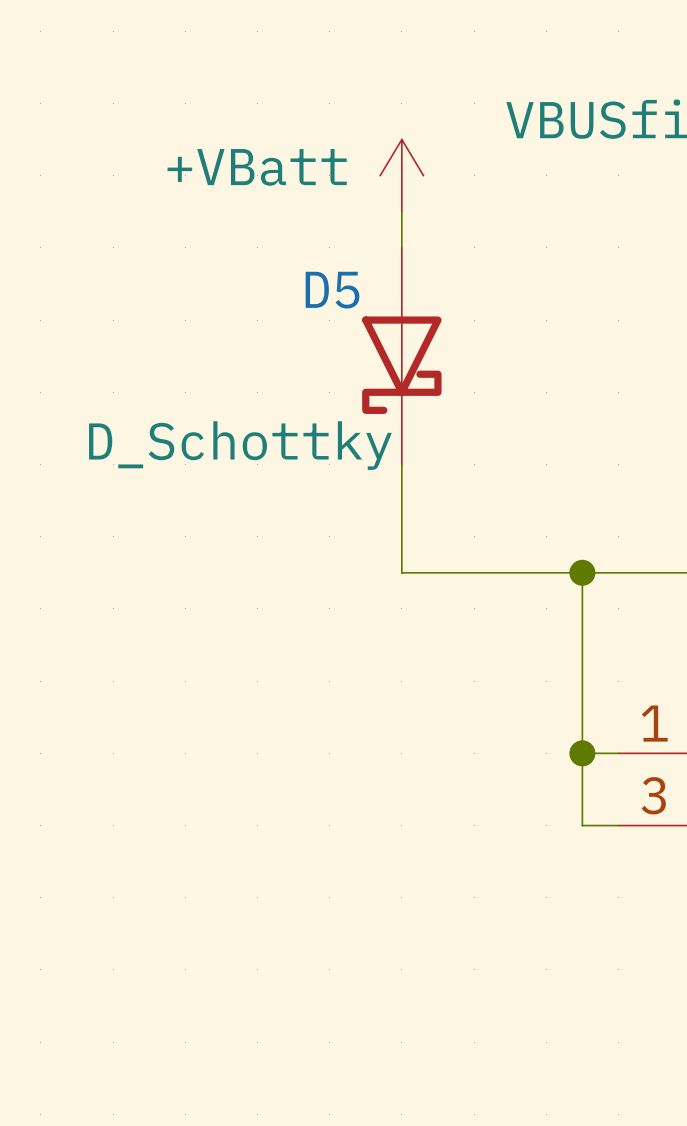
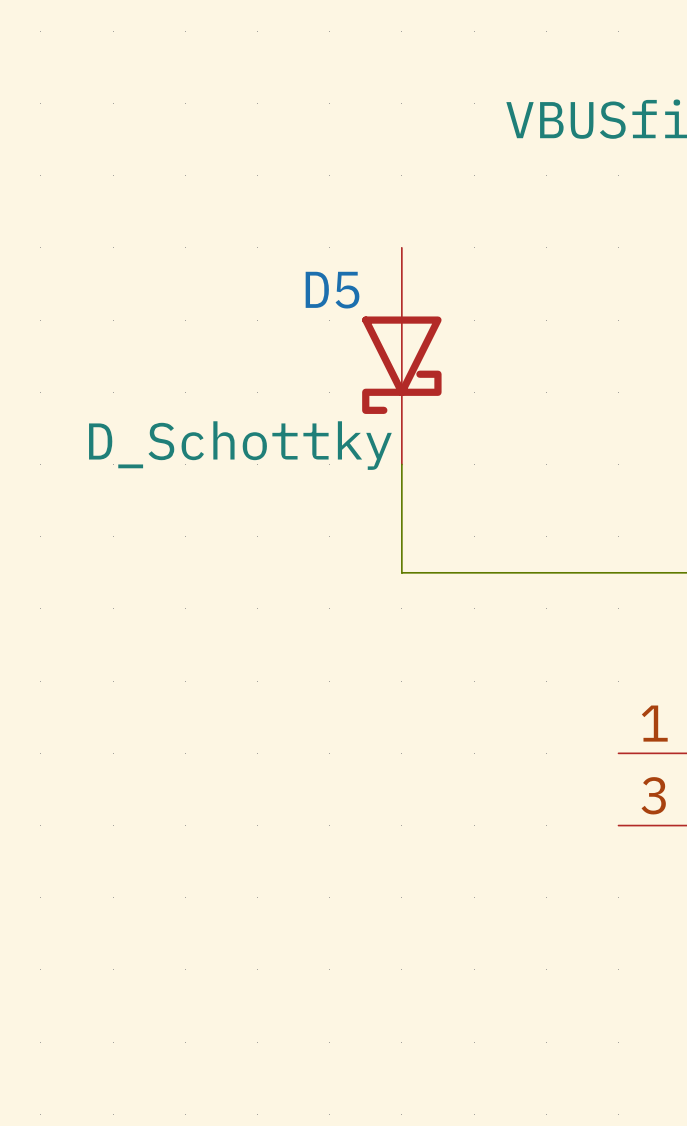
power symbol: +VBatt (401, 175) -> none
wire: (401, 211) (401, 247) -> none
wire: (582, 572) (582, 825) (618, 825) -> none
junction: (582, 572) -> none
wire: (582, 753) (618, 753) -> none
junction: (582, 753) -> none

